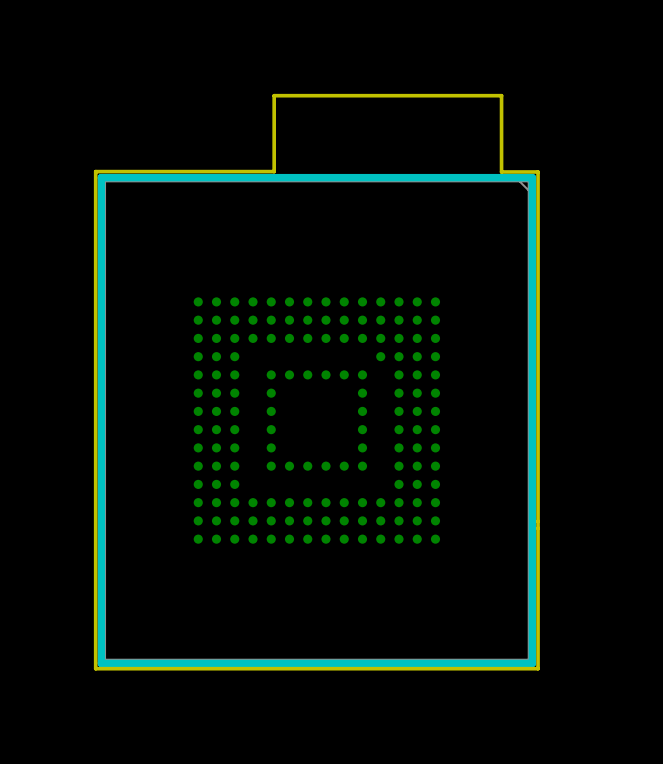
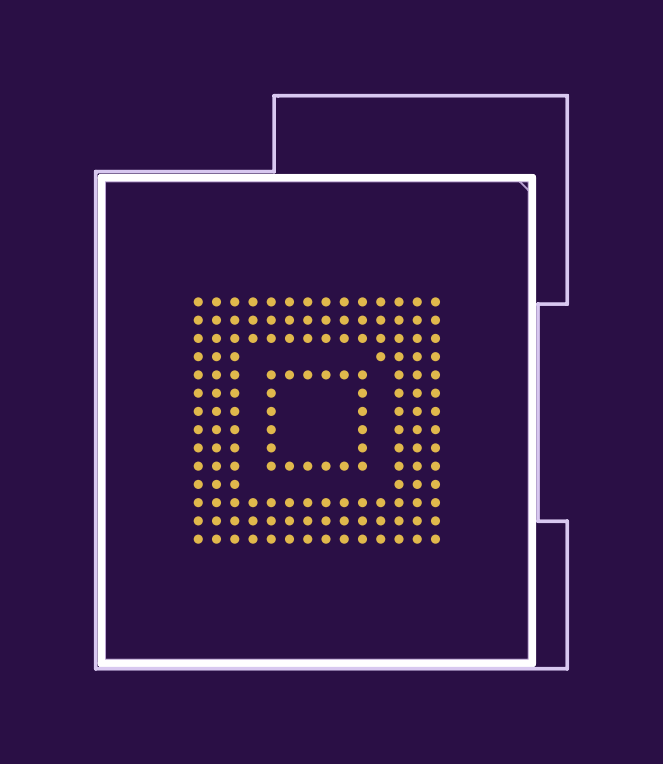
board edge: (501, 95) (501, 171) (538, 171) (538, 304) -> (501, 95) (567, 95) (567, 304) (538, 304)
board edge: (538, 521) (538, 668) -> (538, 521) (567, 521) (567, 668) (538, 668)

